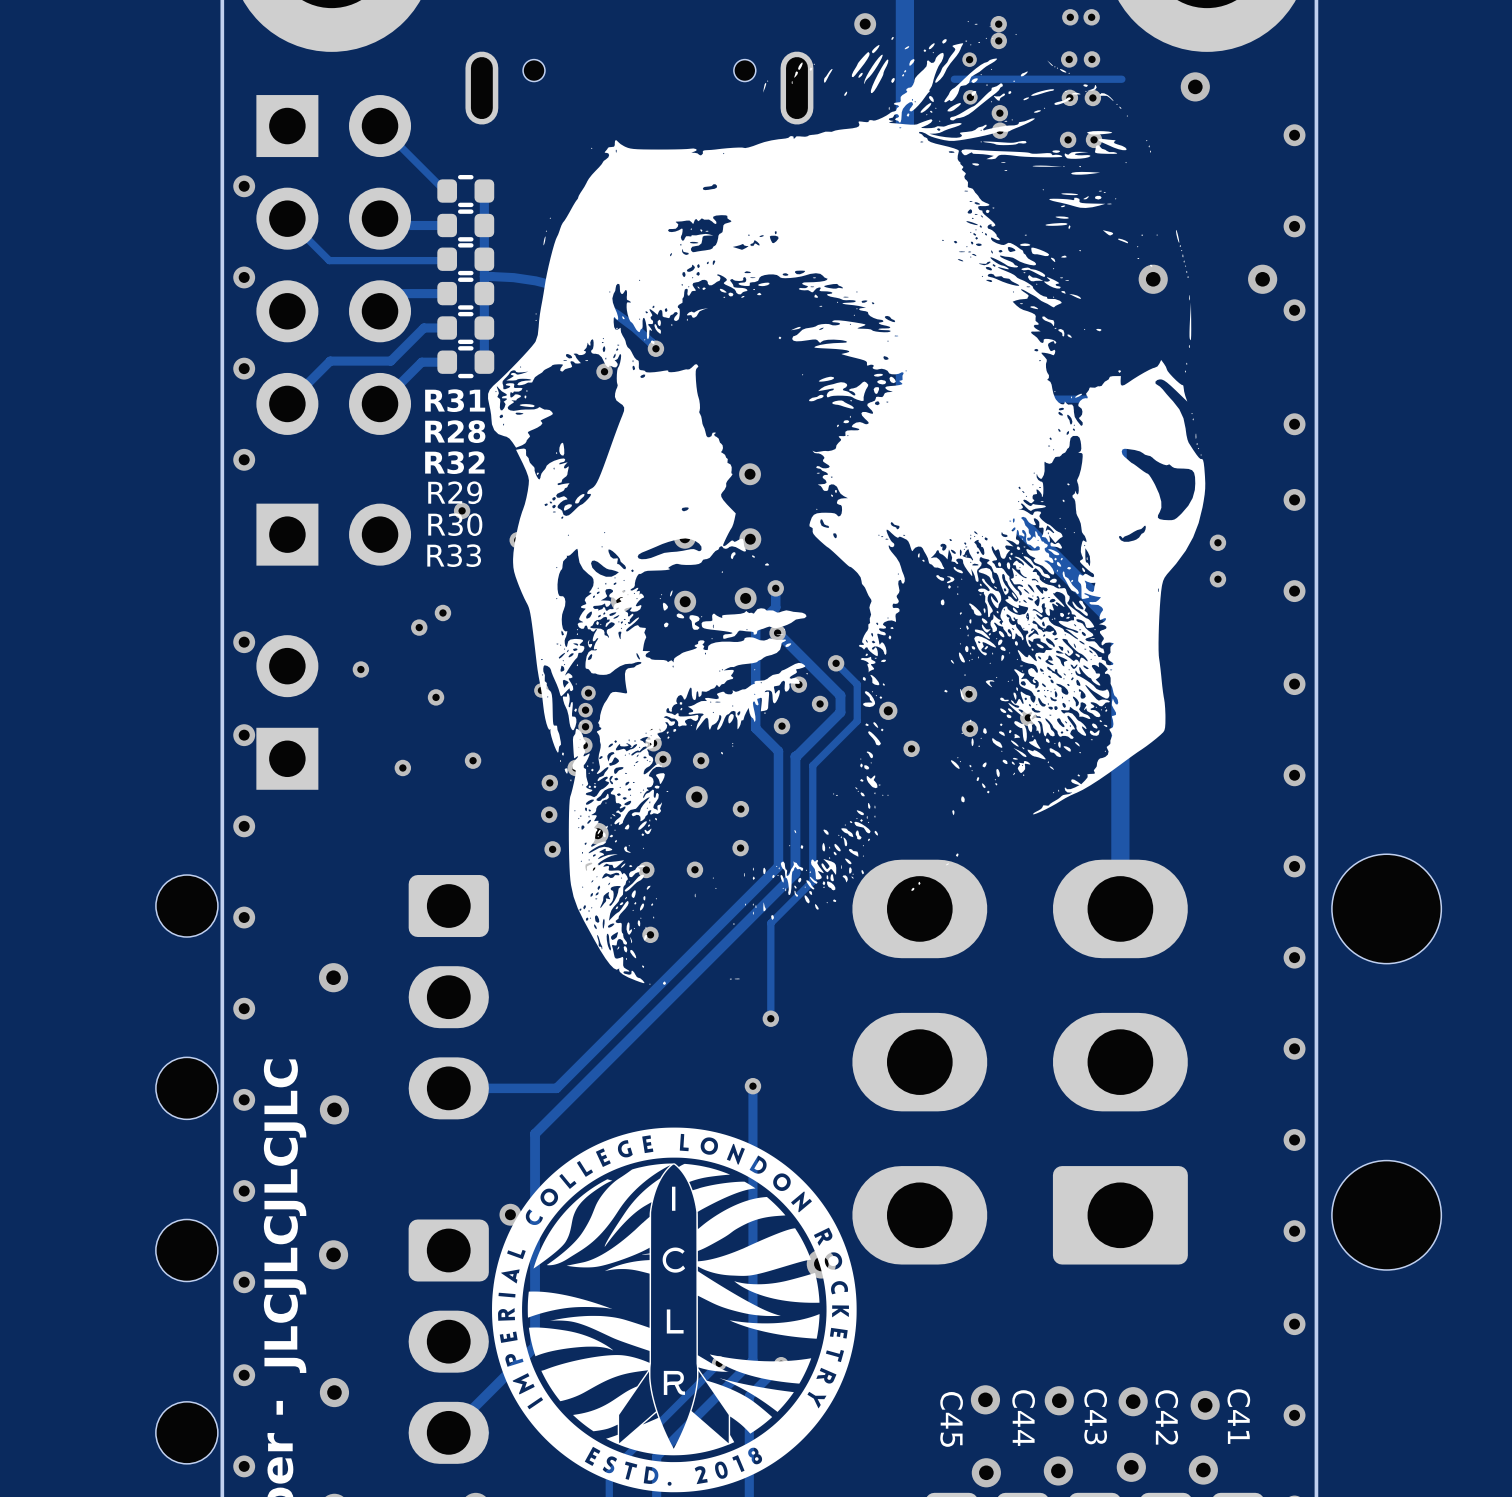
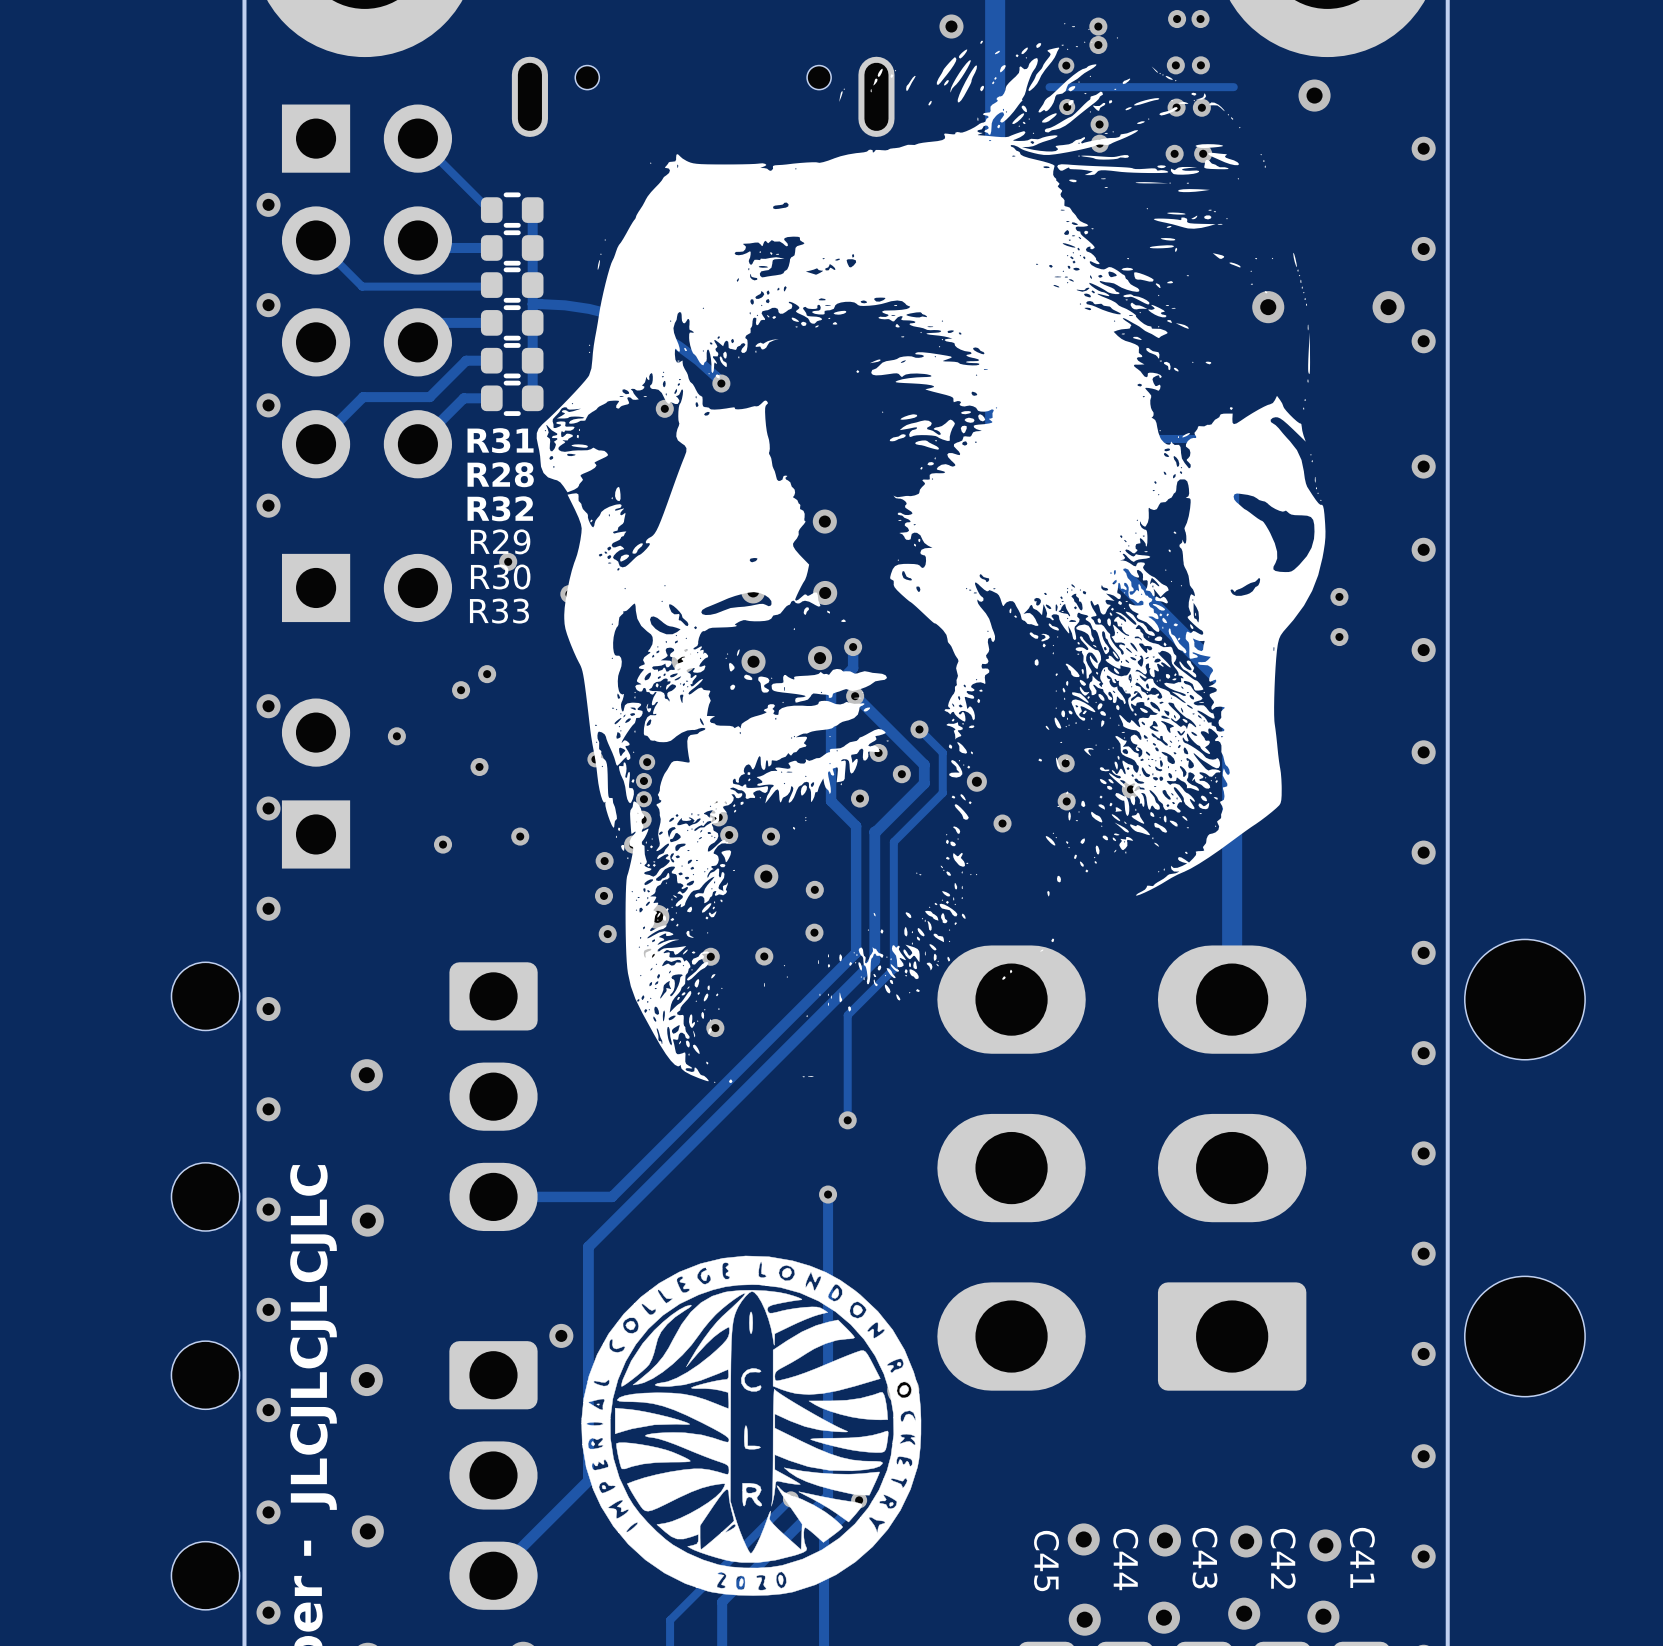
drawing shape: [492, 1127, 857, 1493] -> [581, 1255, 922, 1596]

